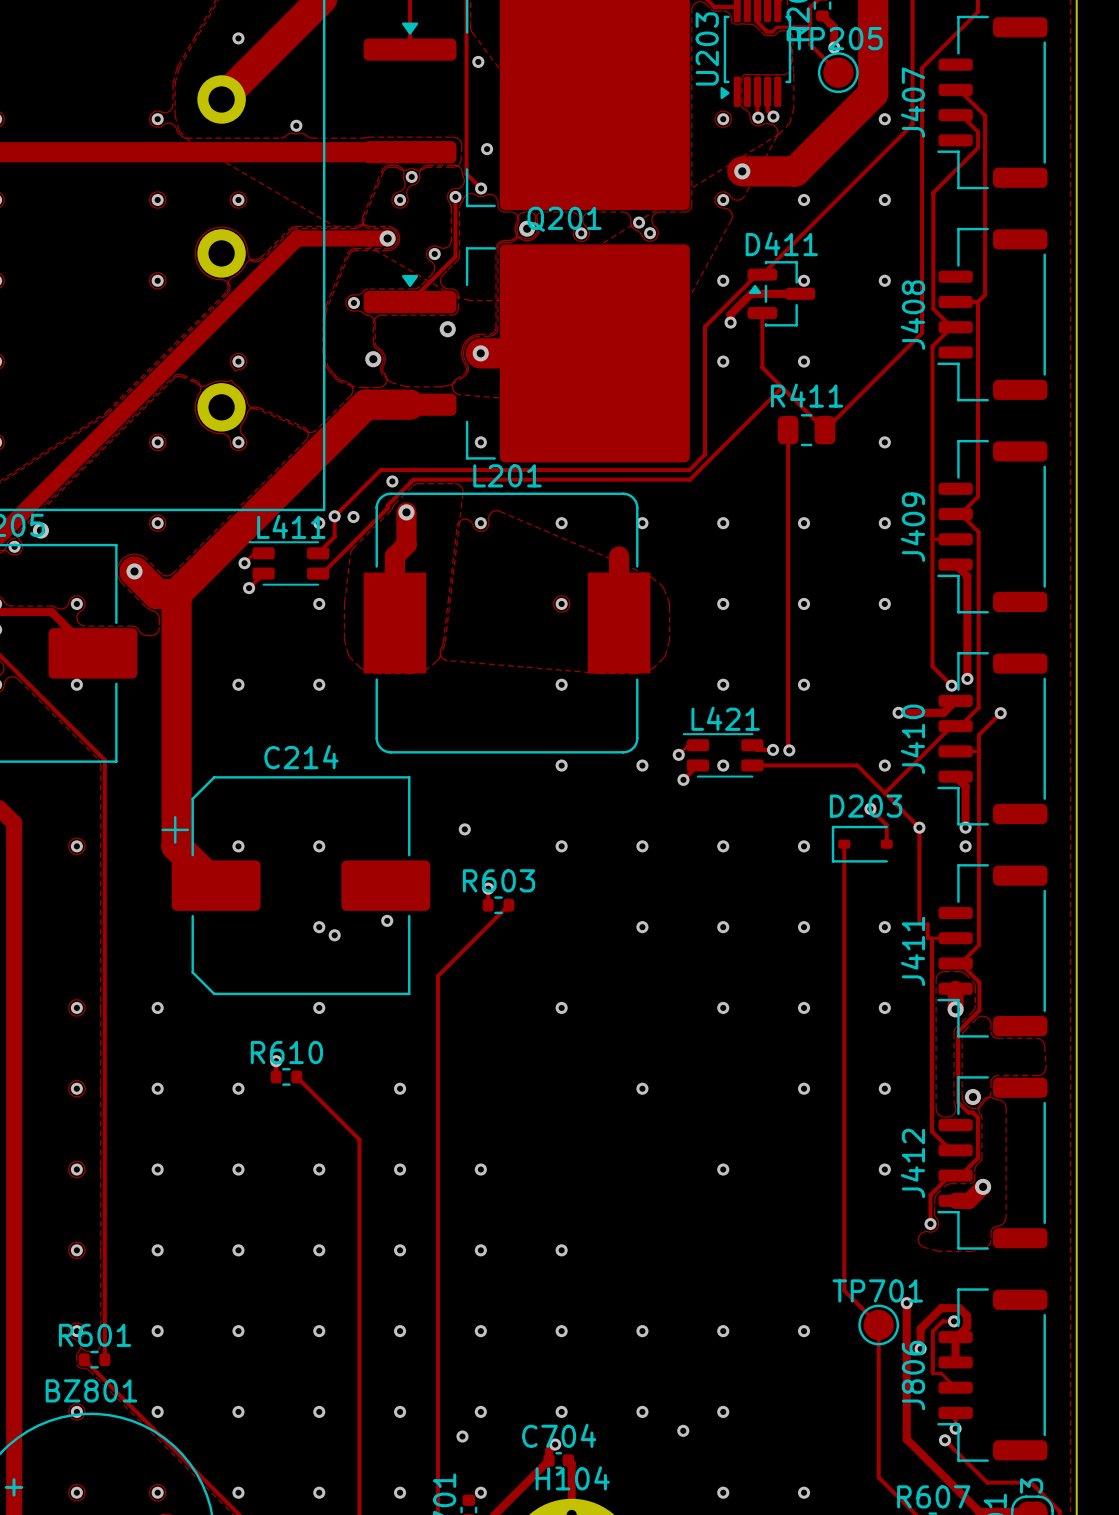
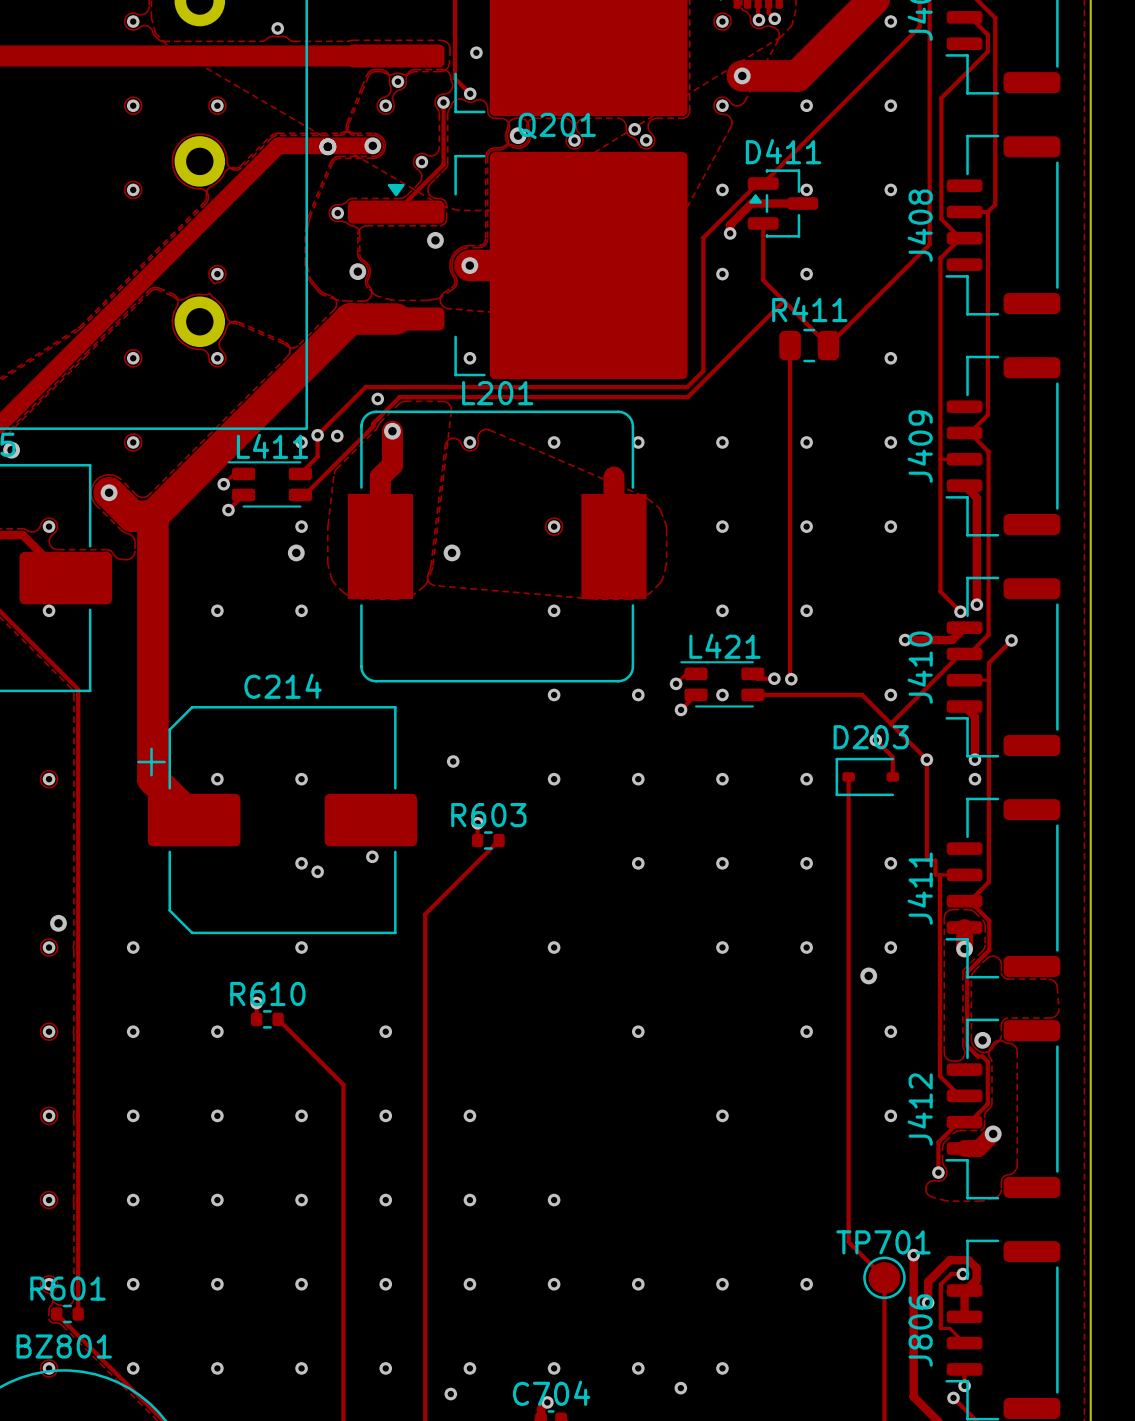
via: none -> (327, 146)
via: none -> (296, 552)
via: none -> (452, 552)
via: none -> (58, 923)
via: none -> (868, 975)

